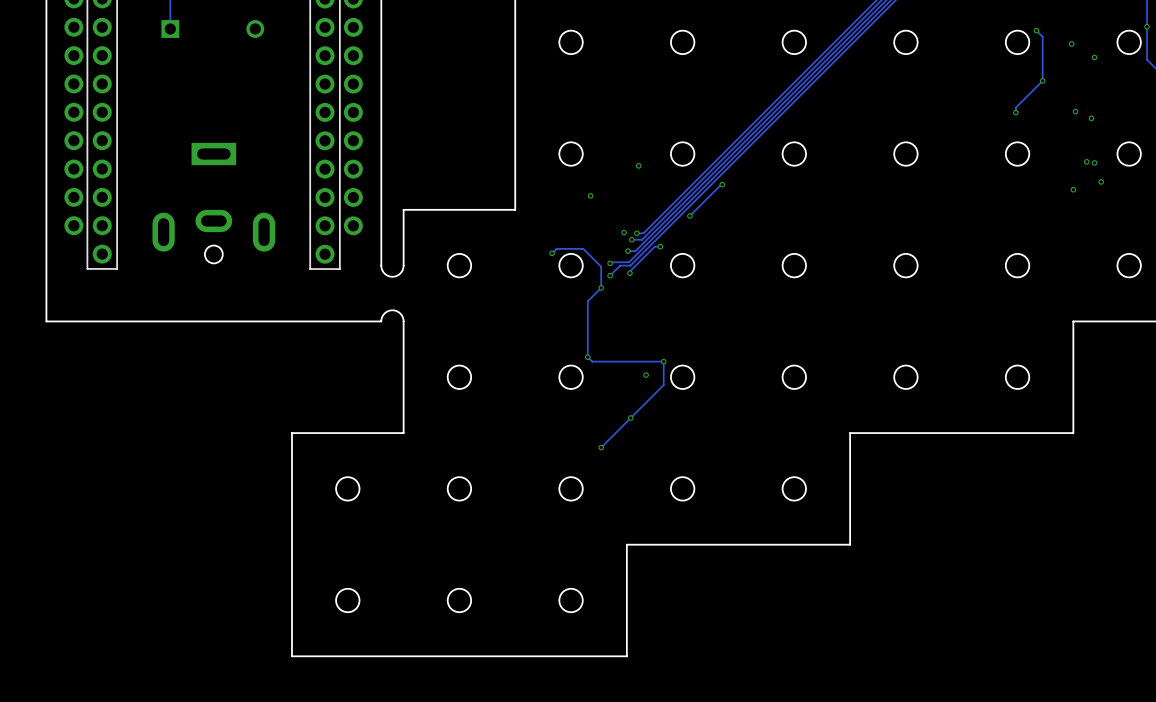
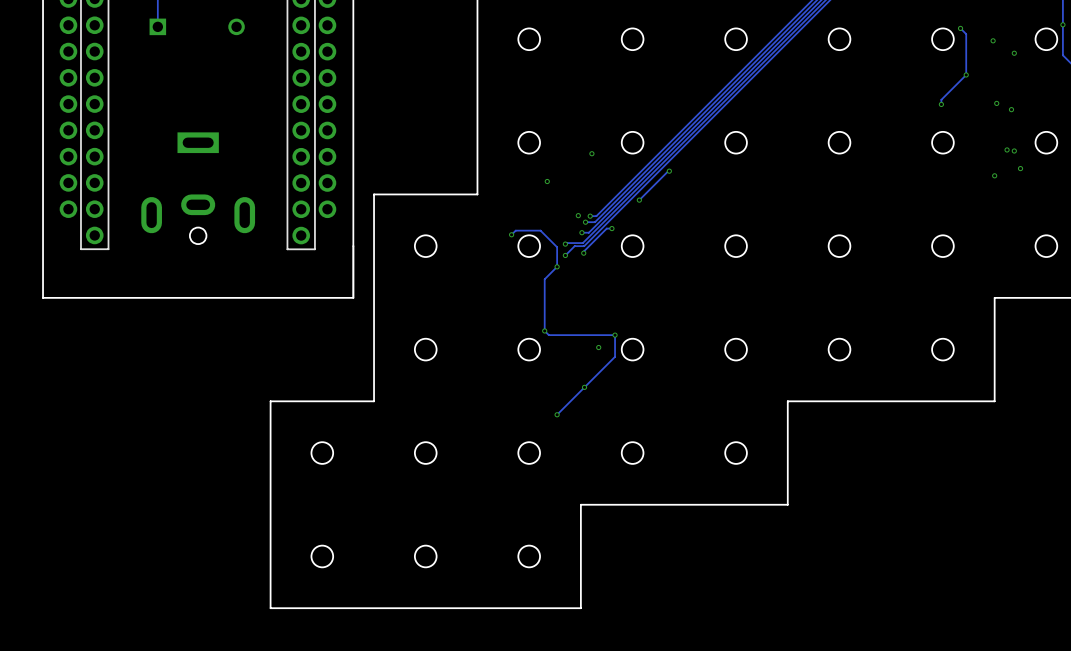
board edge: (403, 265) (400, 273) (392, 276) (384, 273) (381, 265) -> (374, 246) (374, 297)
board edge: (403, 321) (400, 313) (392, 310) (384, 313) (381, 321) -> (353, 246) (353, 297)

